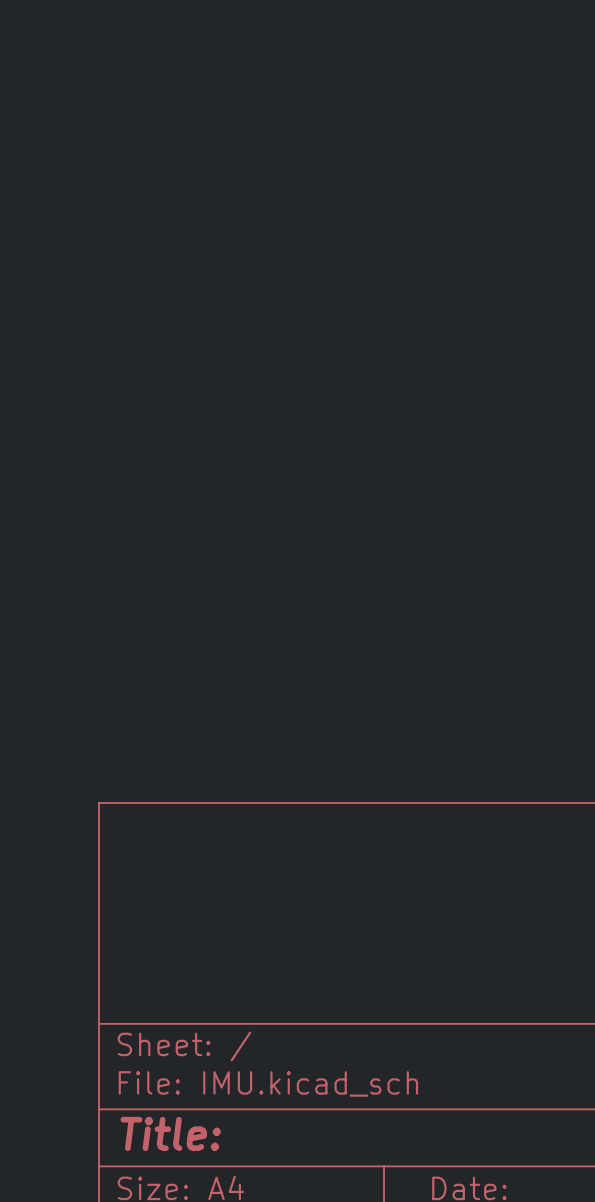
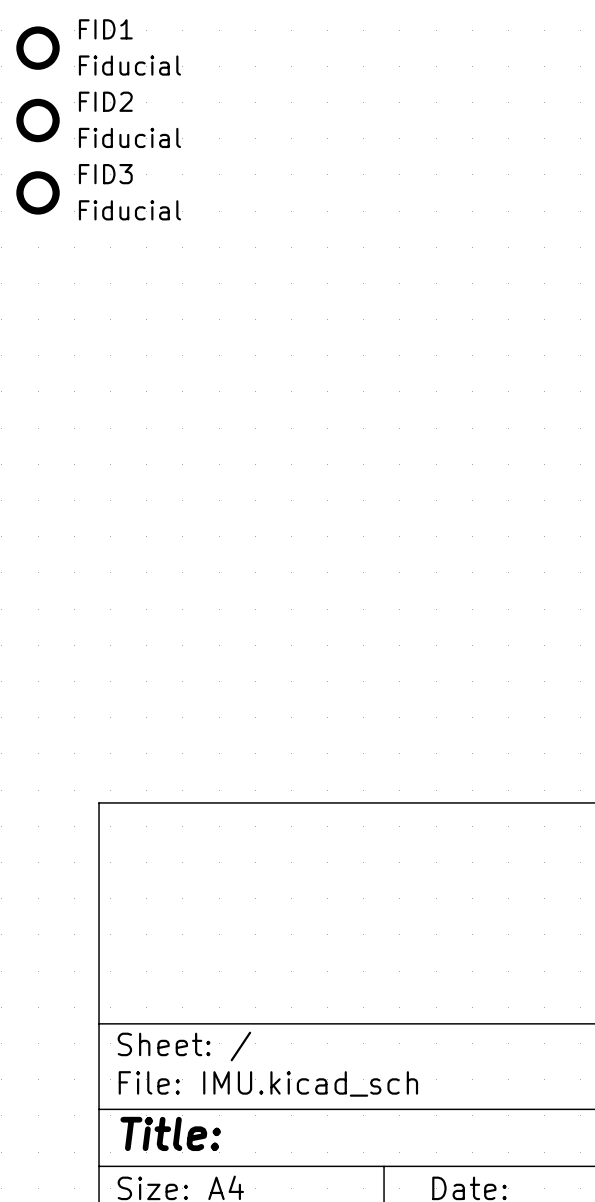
FID1: none -> Fiducial (38, 48)
FID2: none -> Fiducial (38, 120)
FID3: none -> Fiducial (38, 192)

